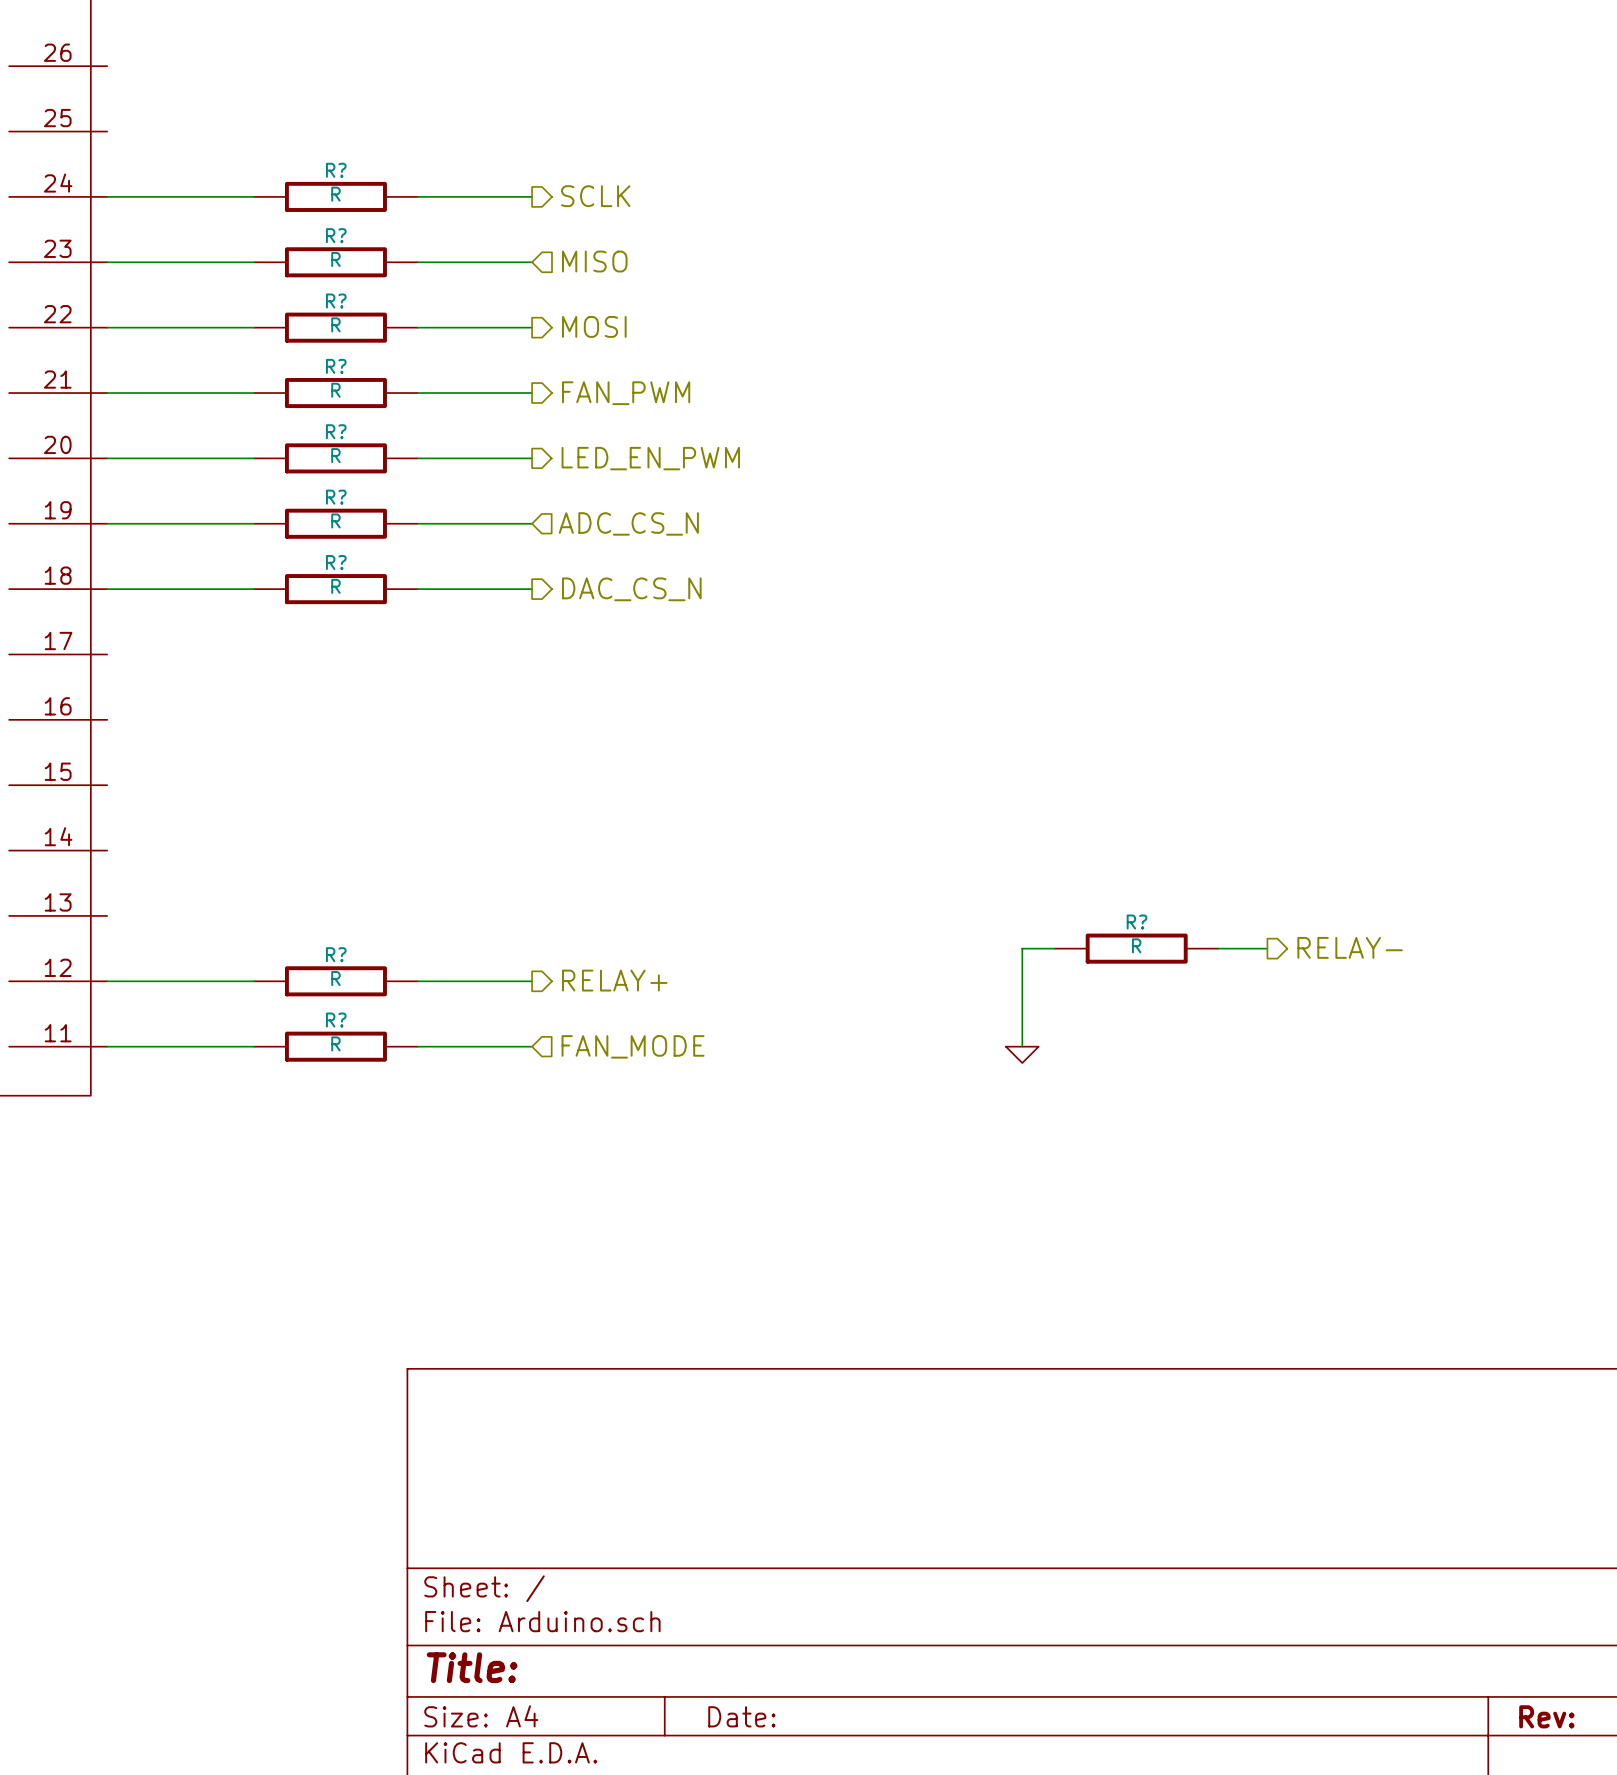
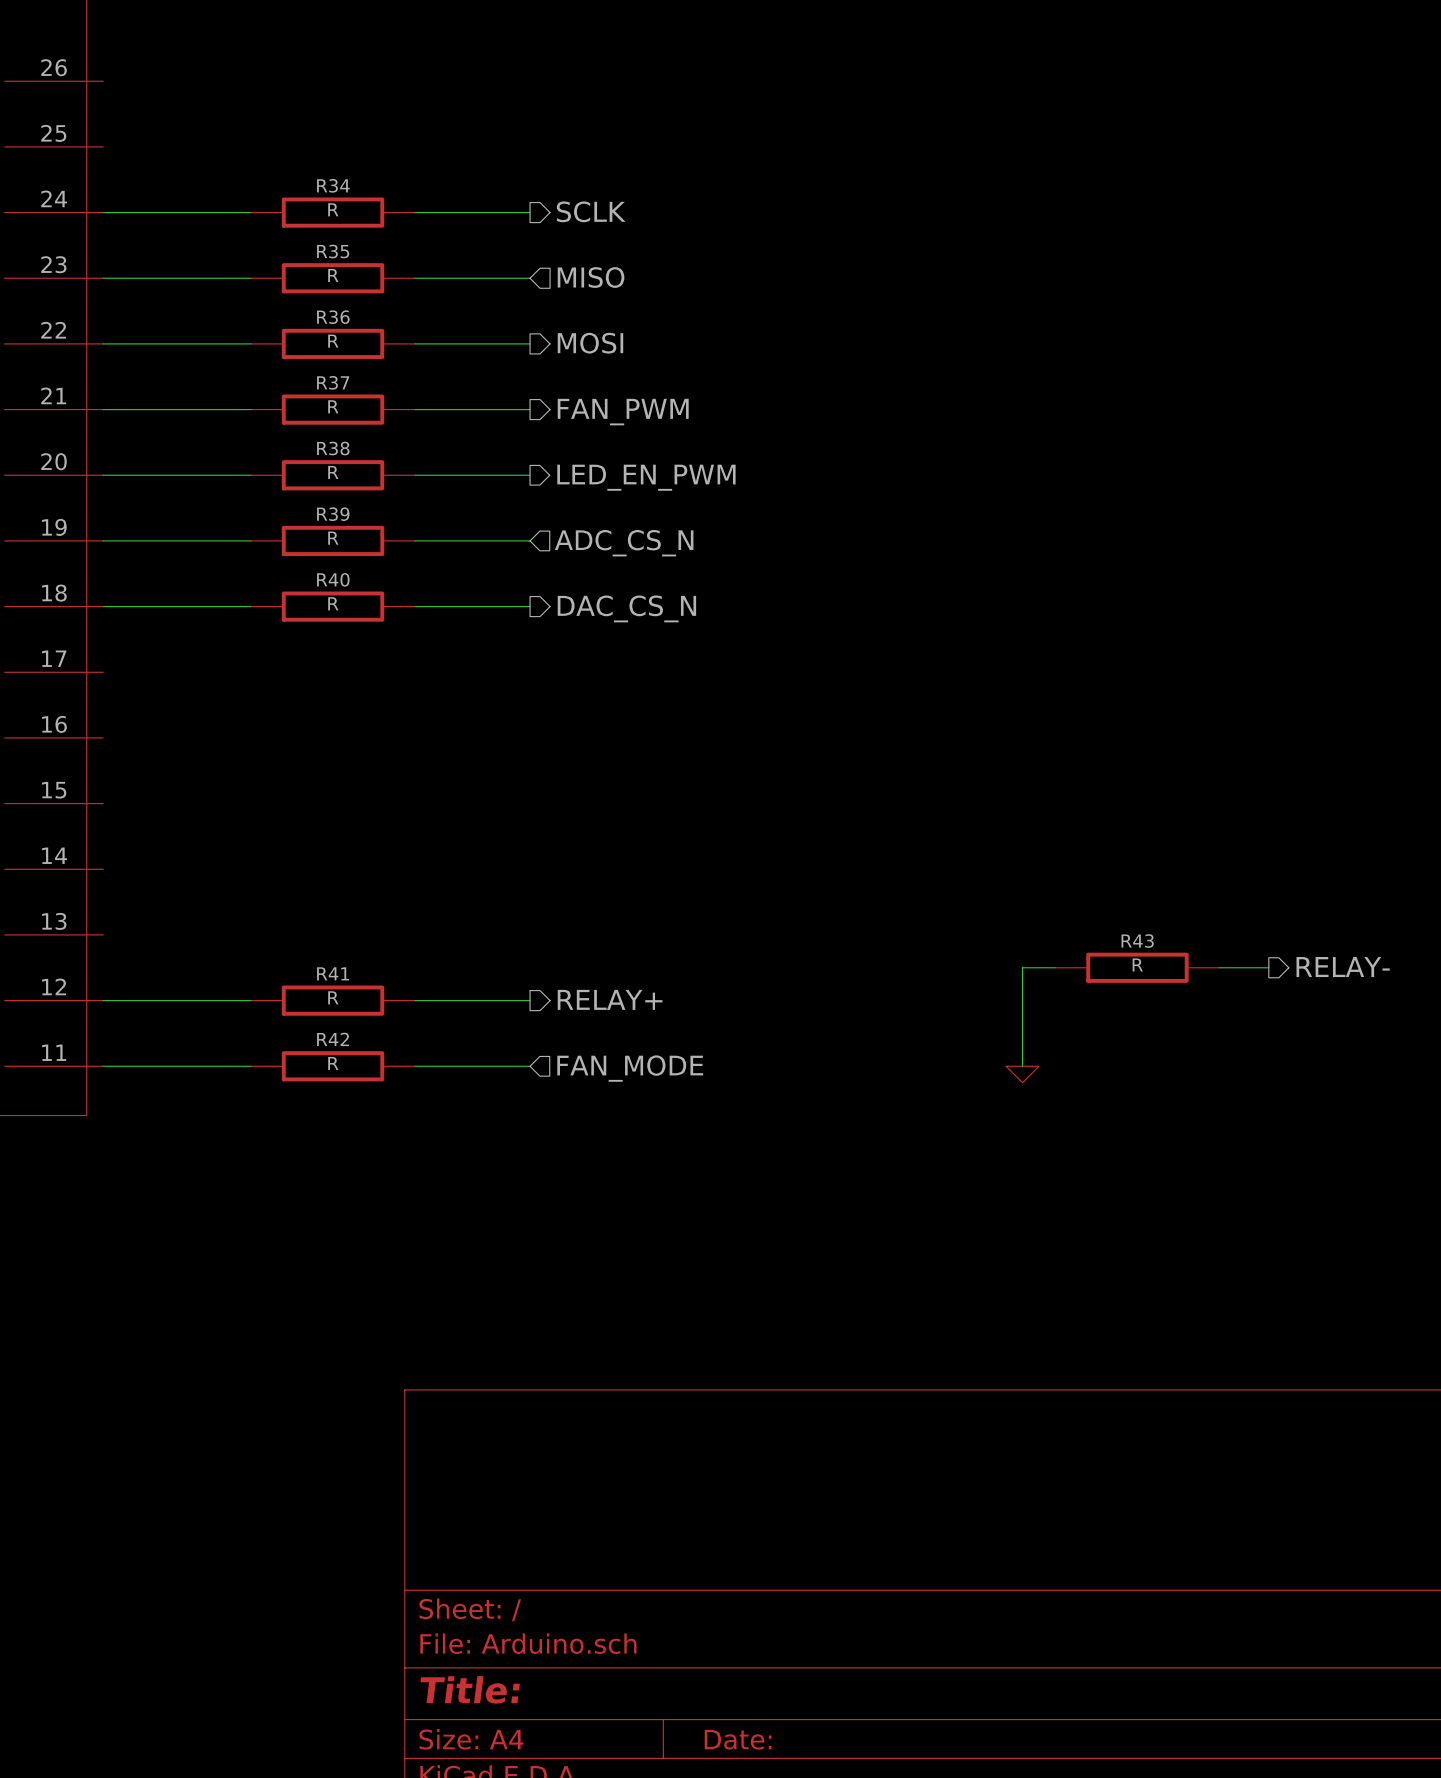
R? name: R? (336, 170) -> R34 (333, 185)
R? name: R? (336, 235) -> R35 (333, 251)
R? name: R? (336, 301) -> R36 (333, 317)
R? name: R? (336, 366) -> R37 (333, 382)
R? name: R? (336, 431) -> R38 (333, 448)
R? name: R? (336, 497) -> R39 (333, 514)
R? name: R? (336, 562) -> R40 (333, 579)
R? name: R? (1137, 921) -> R43 (1137, 941)
R? name: R? (336, 954) -> R41 (333, 973)
R? name: R? (336, 1020) -> R42 (333, 1039)

